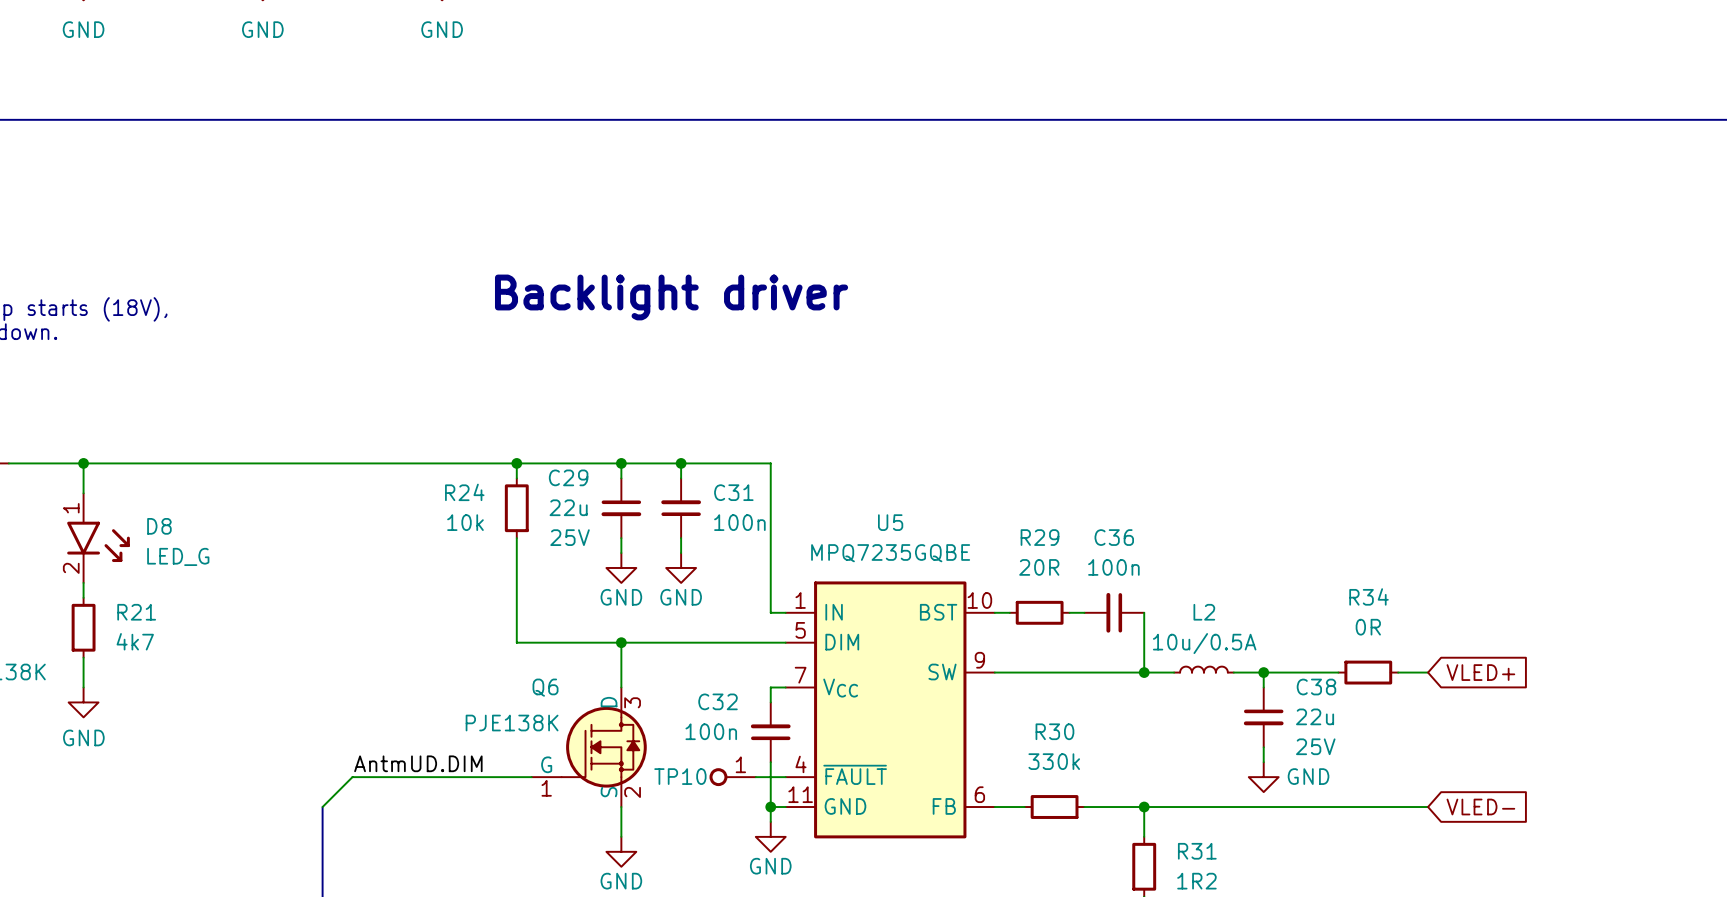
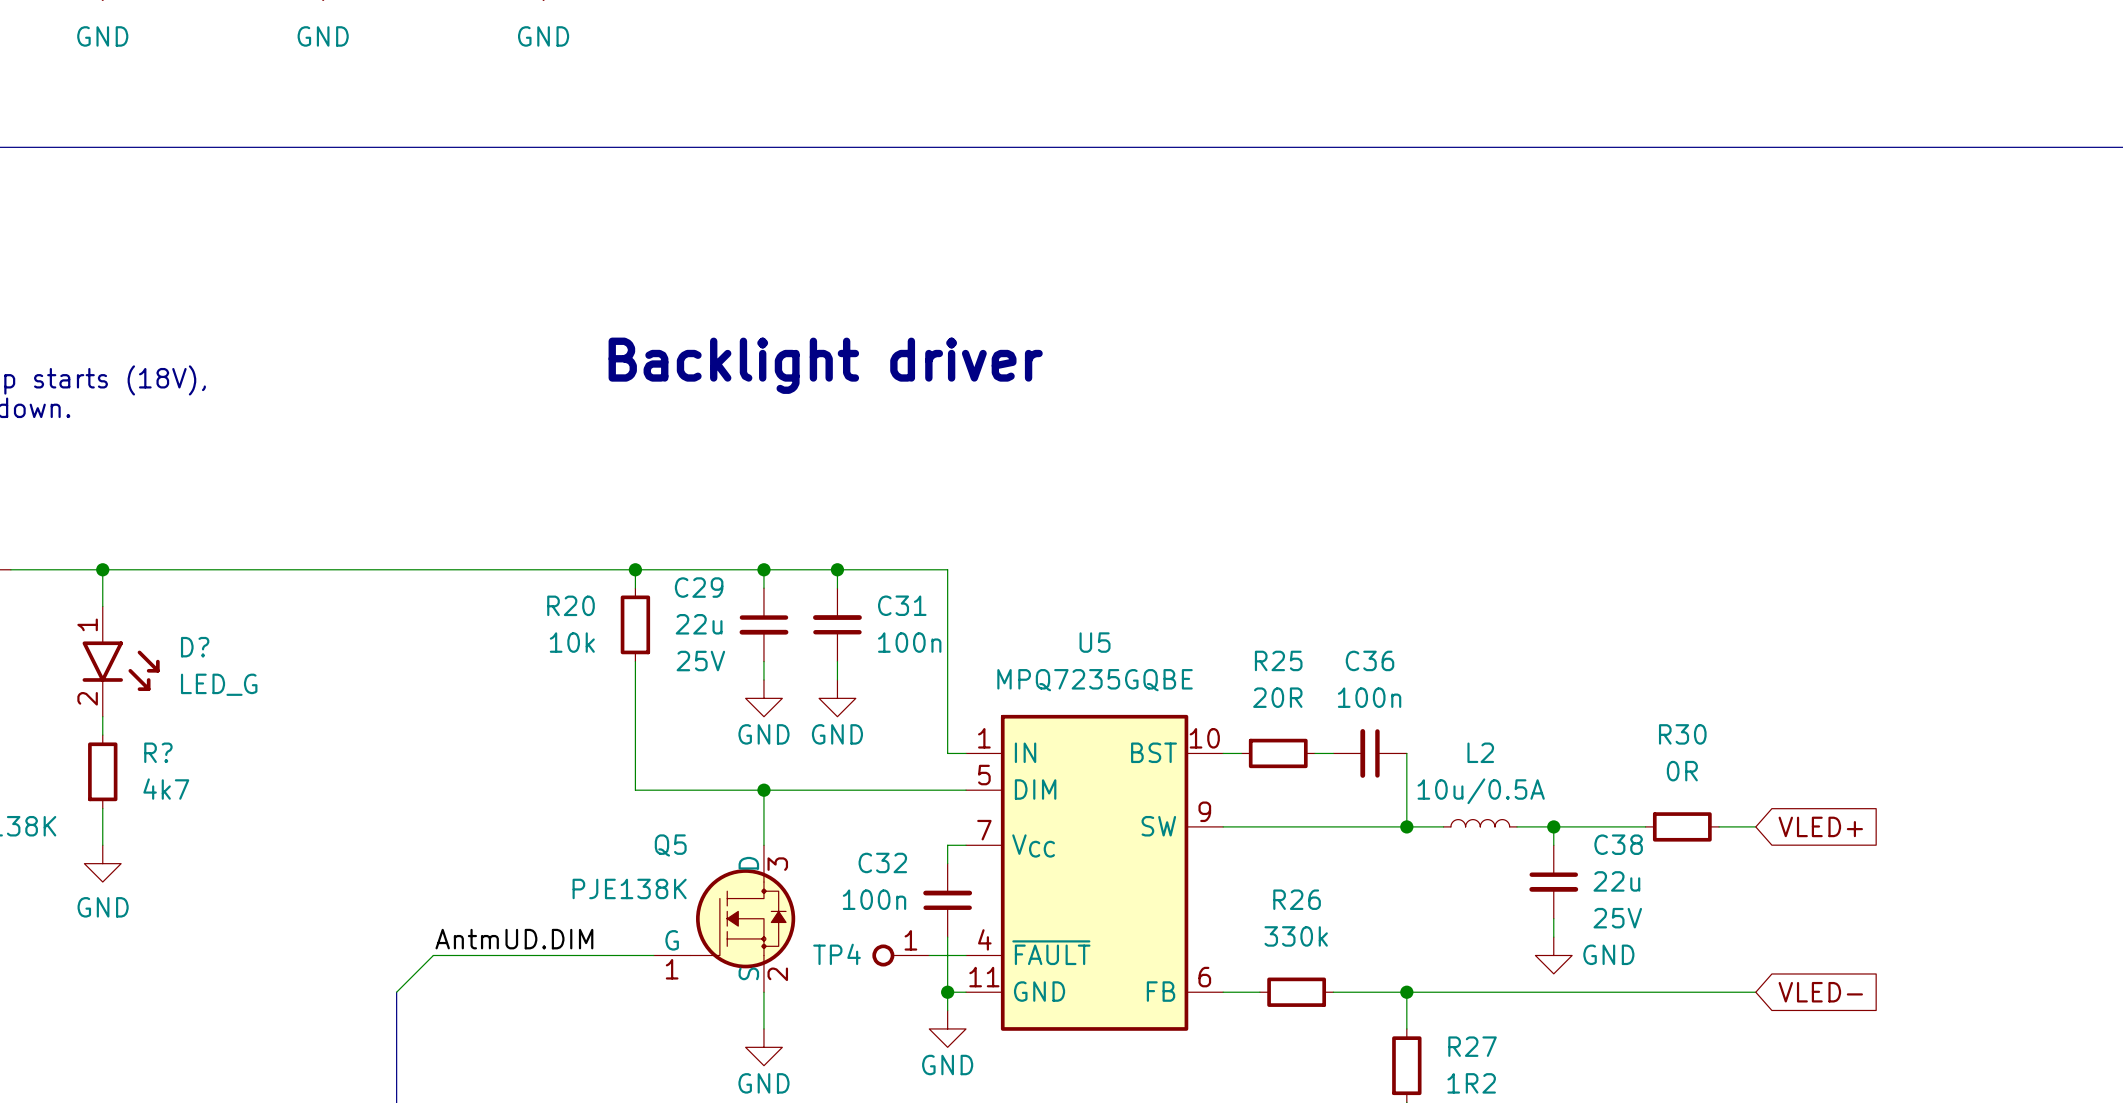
R24 name: R24 (464, 492) -> R20 (571, 605)
D8 name: D8 (159, 526) -> D? (195, 647)
R29 name: R29 (1040, 537) -> R25 (1278, 660)
R34 name: R34 (1369, 596) -> R30 (1682, 734)
R21 name: R21 (136, 612) -> R? (158, 752)
Q6 name: Q6 (545, 687) -> Q5 (670, 845)
R30 name: R30 (1054, 731) -> R26 (1297, 899)
TP10 name: TP10 (680, 776) -> TP4 (837, 954)
R31 name: R31 (1197, 851) -> R27 (1472, 1046)

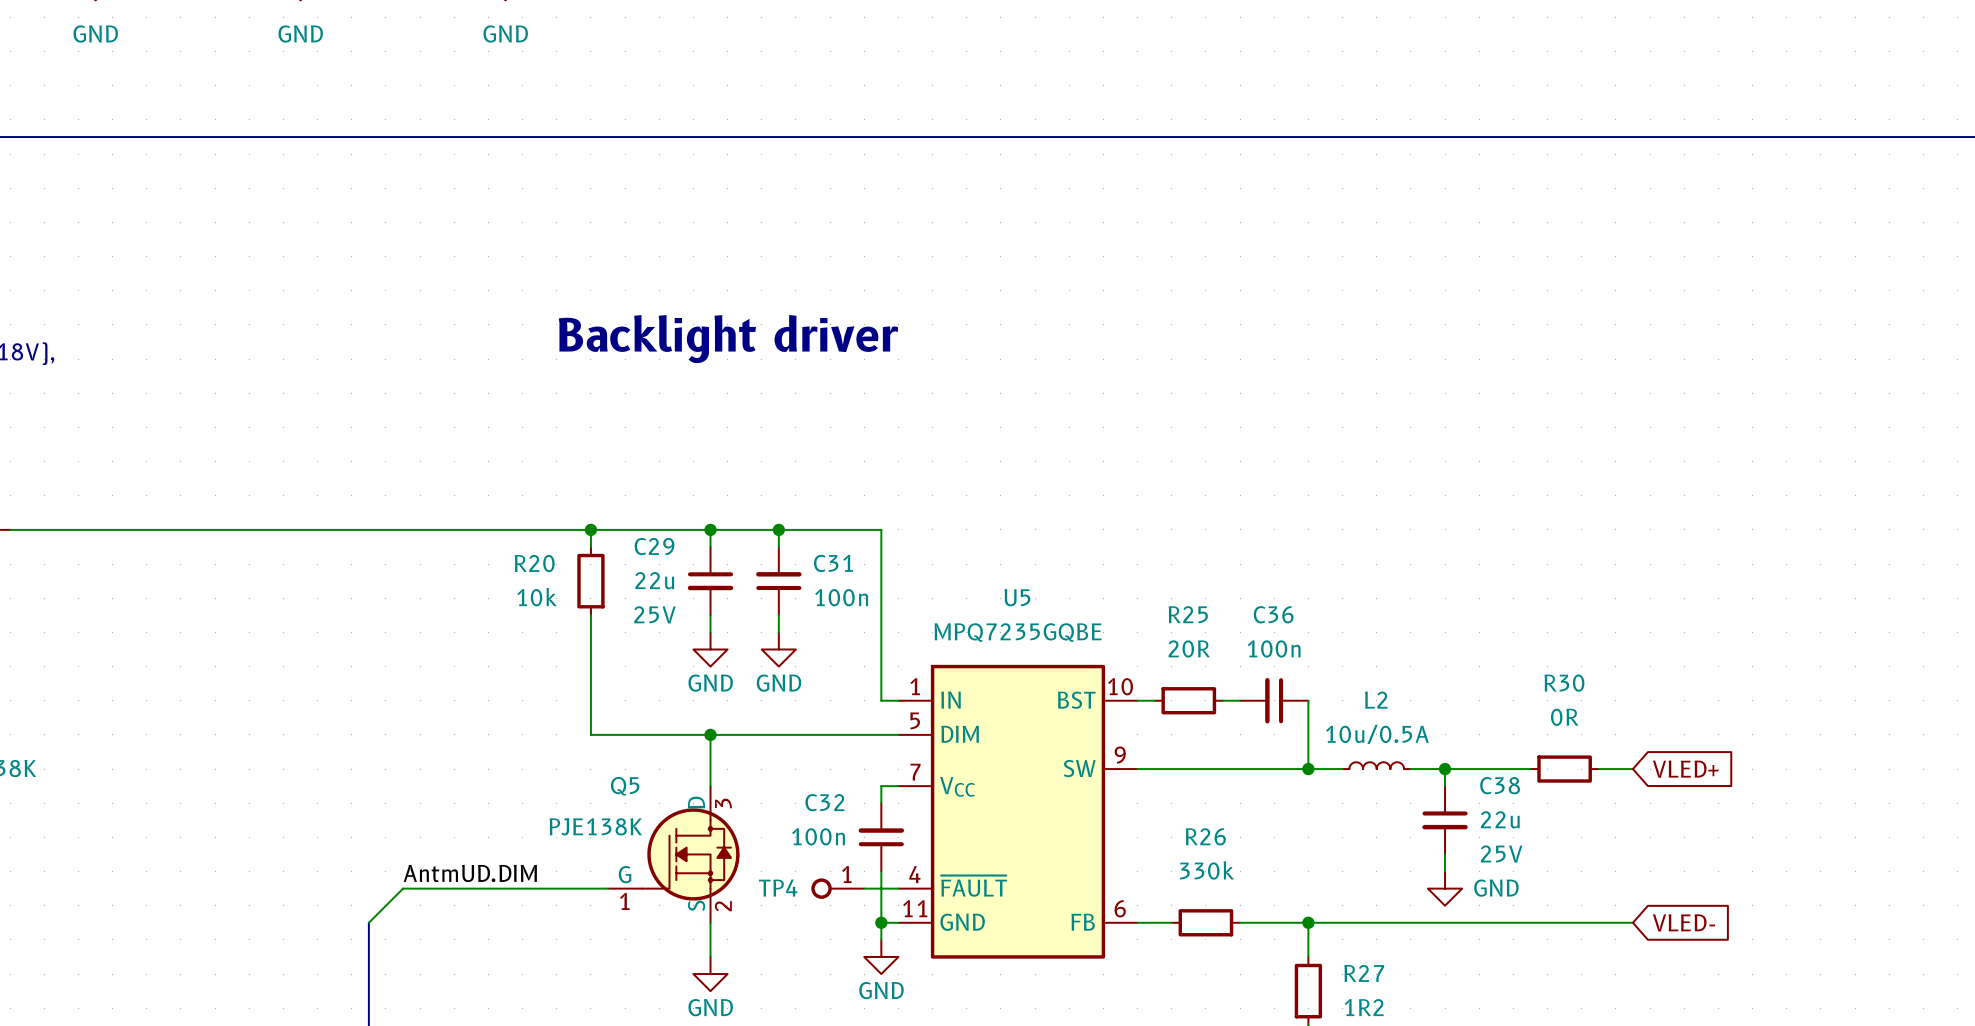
wire: (102, 569) (102, 606) -> none
junction: (102, 569) -> none
D?: LED_G (121, 661) -> none
wire: (102, 716) (102, 735) -> none
R?: (102, 771) -> none
wire: (102, 808) (102, 845) -> none
power symbol: GND (102, 863) -> none

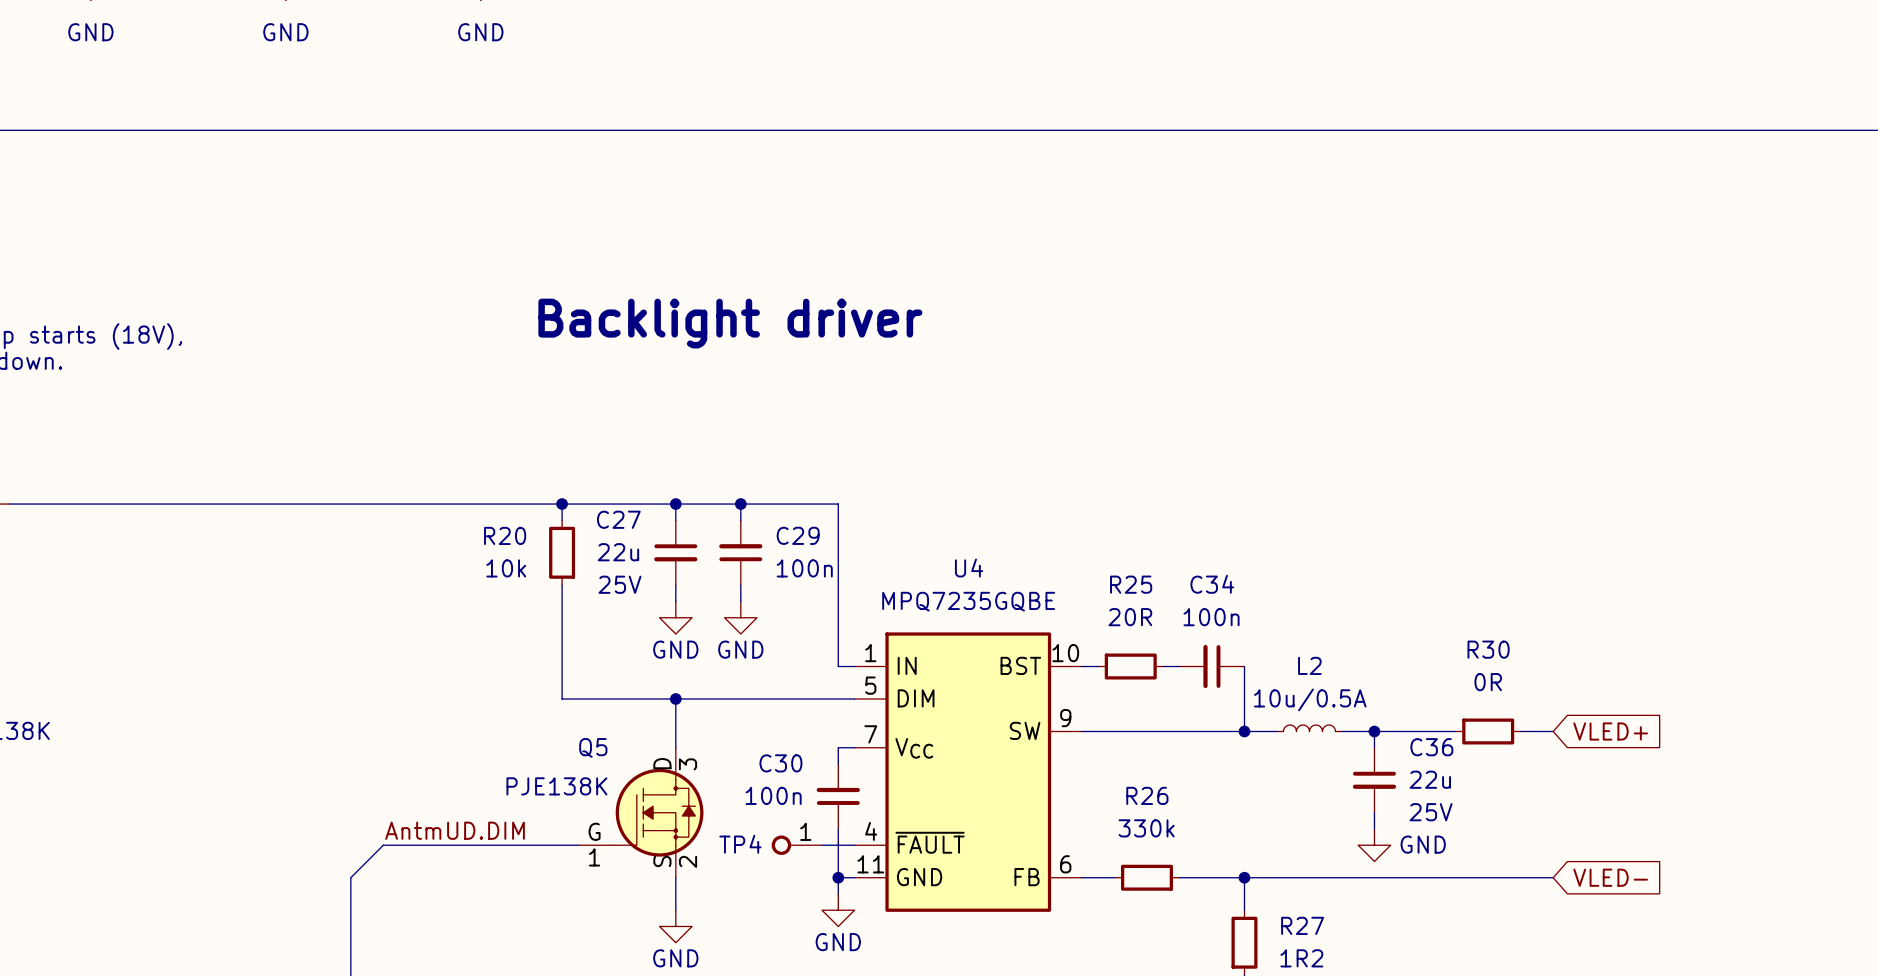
C29 name: C29 (654, 546) -> C27 (618, 519)
C31 name: C31 (833, 563) -> C29 (798, 535)
U5 name: U5 (1017, 597) -> U4 (969, 568)
C36 name: C36 (1273, 614) -> C34 (1212, 584)
C38 name: C38 (1500, 785) -> C36 (1431, 747)
C32 name: C32 (824, 802) -> C30 (780, 763)

